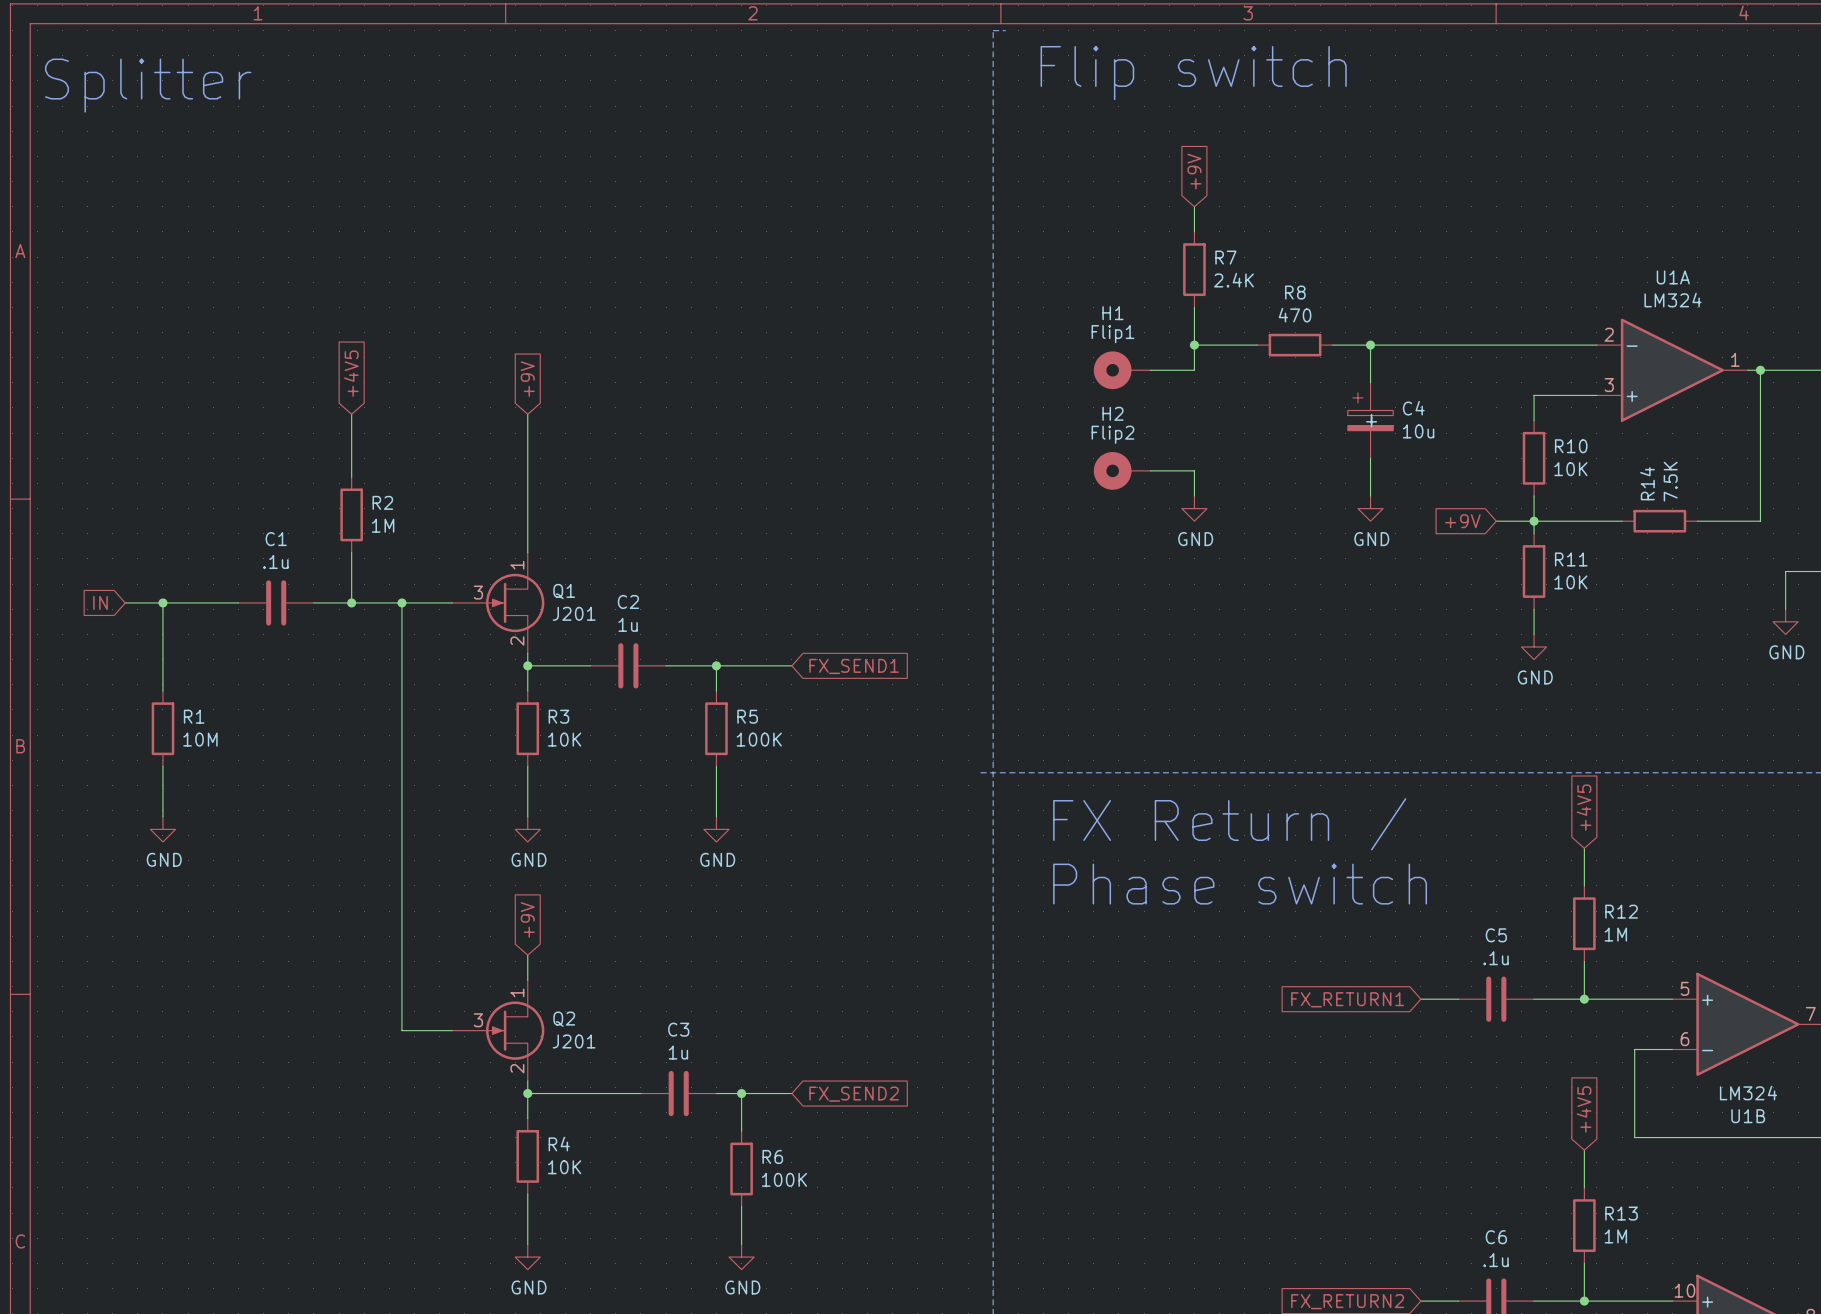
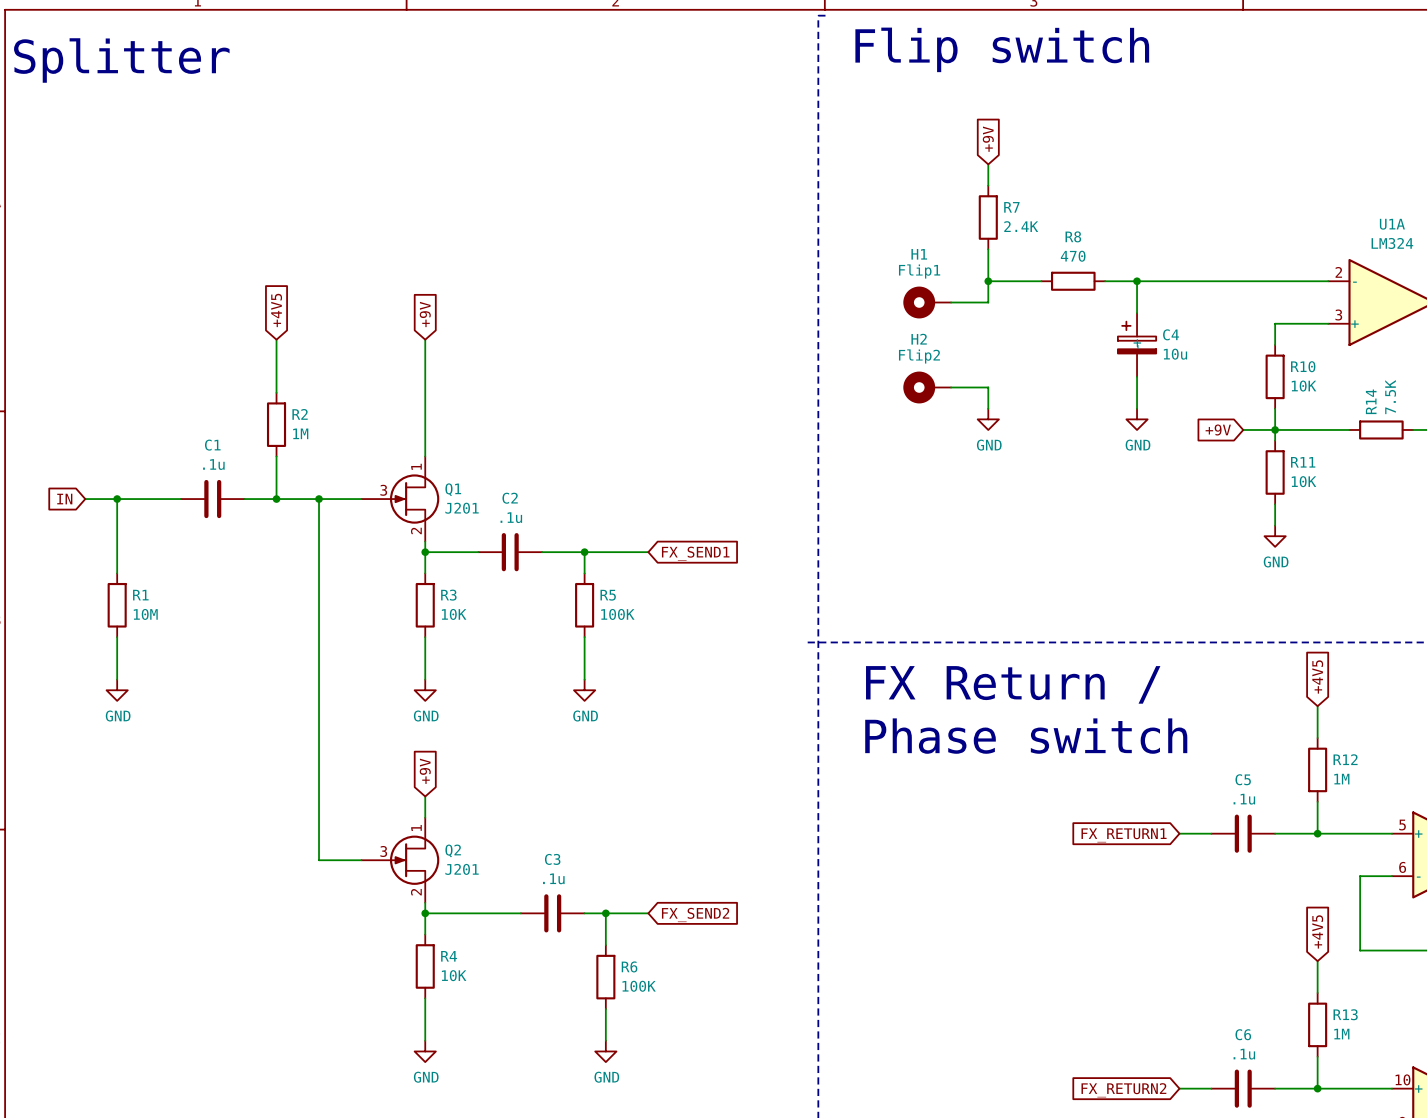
C2 value: 1u (628, 624) -> .1u (511, 517)
C3 value: 1u (678, 1052) -> .1u (553, 878)

